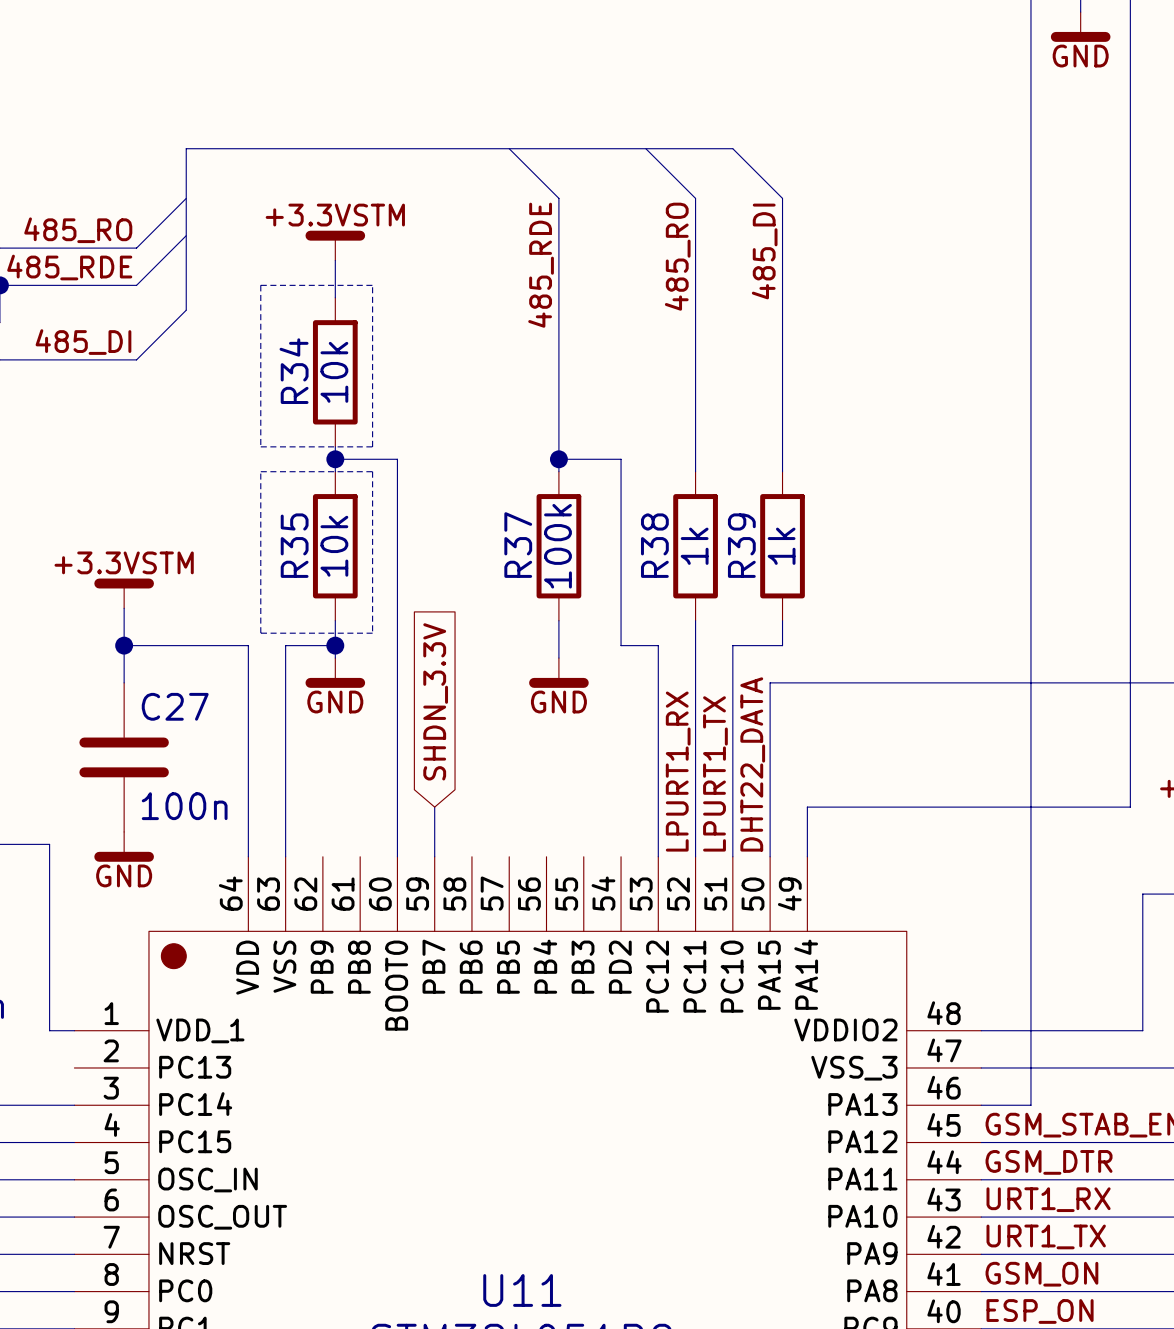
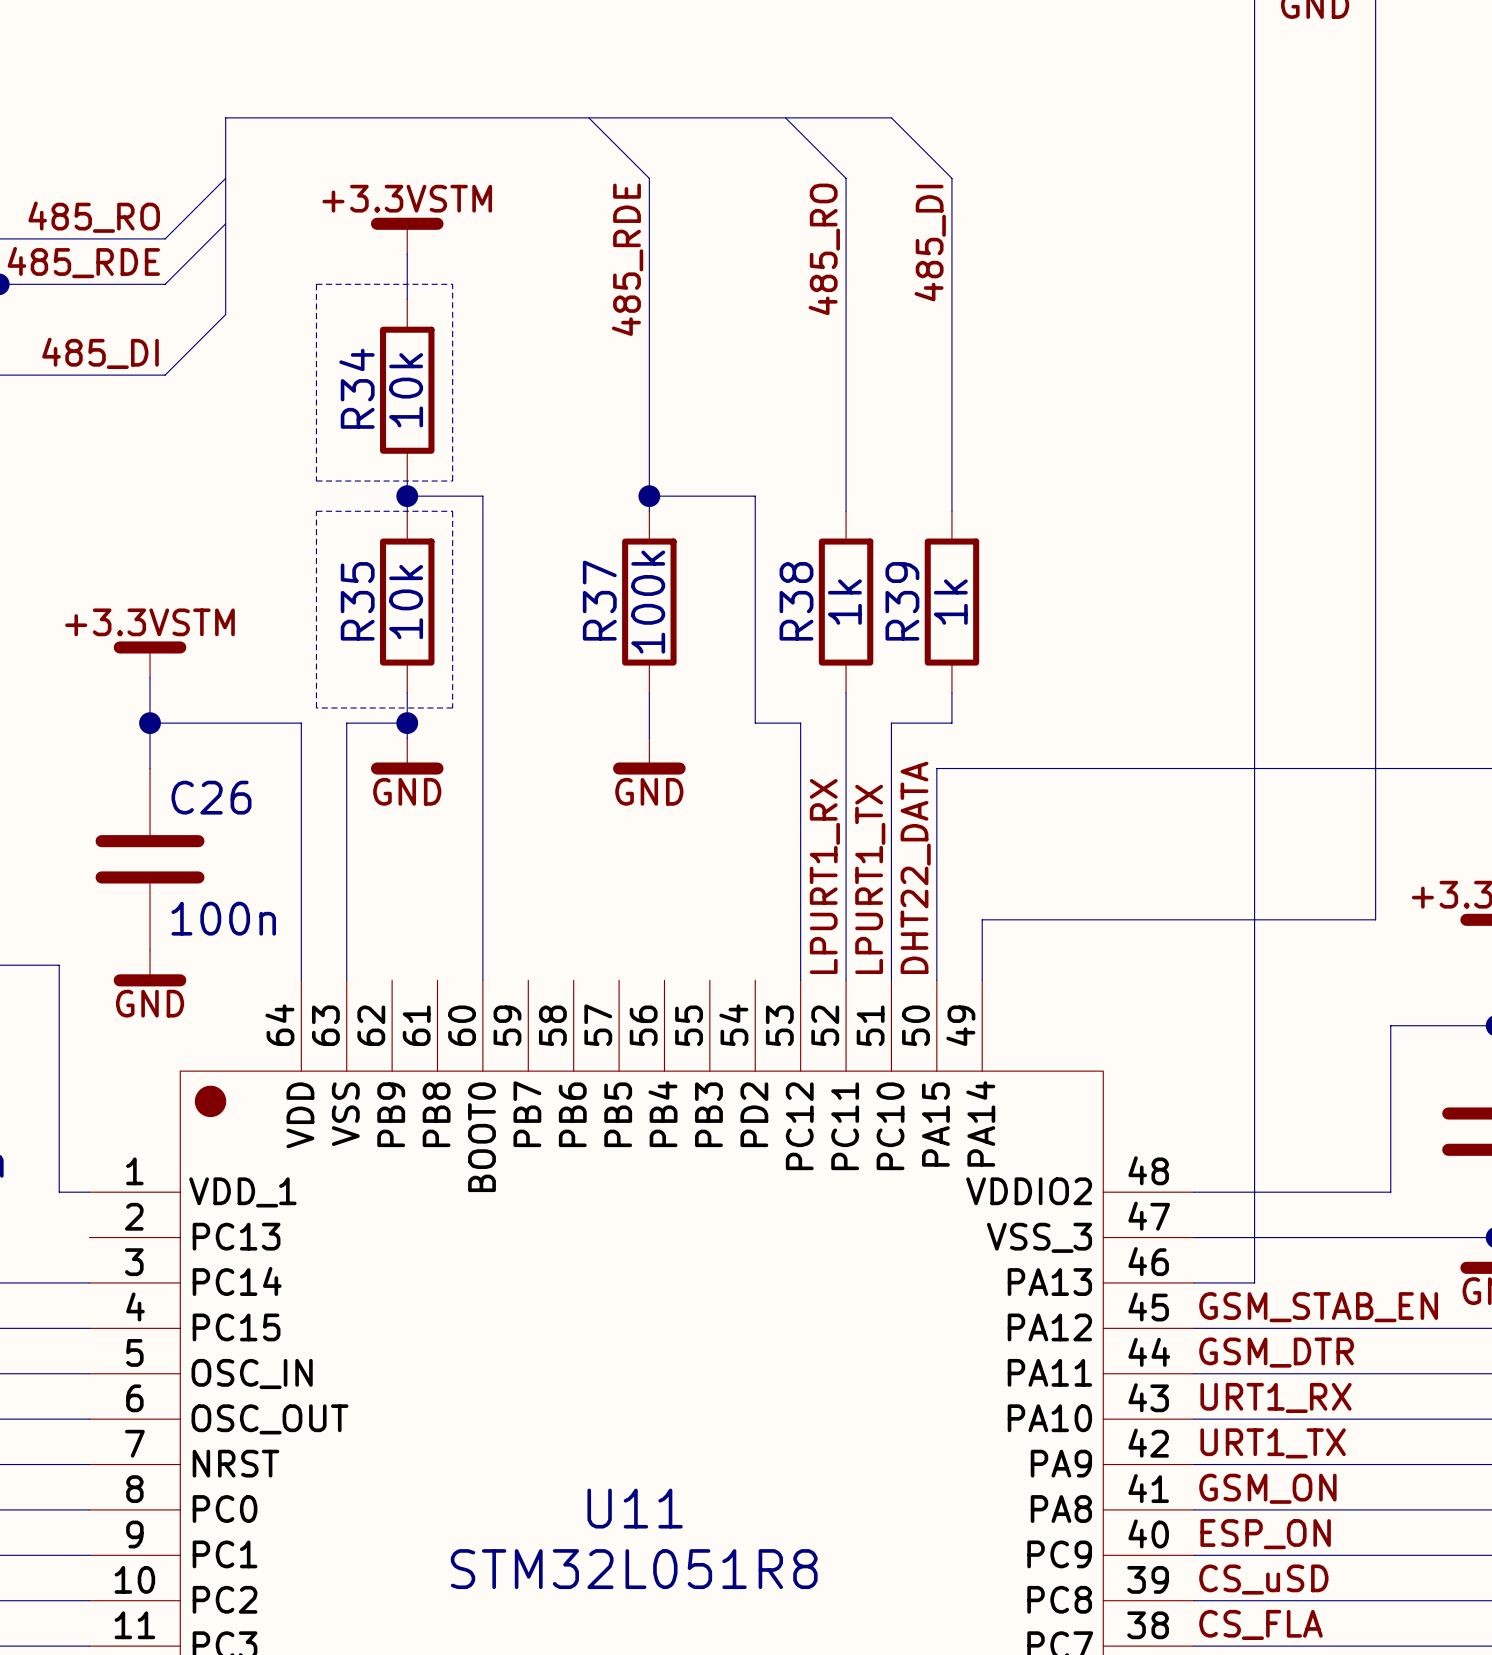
wire: (509, 148) (558, 198) (558, 471) -> (588, 117) (649, 178) (649, 511)
label position: 485_RDE (541, 265) -> 485_RDE (627, 259)
wire: none -> (649, 496) (679, 496)
junction position: (558, 459) -> (649, 496)
R37 position: (558, 546) -> (649, 602)
wire: (558, 620) (558, 658) -> (649, 692) (649, 738)
power symbol position: (558, 672) -> (649, 756)
global label: SHDN_3.3V (435, 701) -> none
C27 name: C27 (175, 706) -> C26 (211, 797)
wire: (434, 807) (434, 856) -> none

